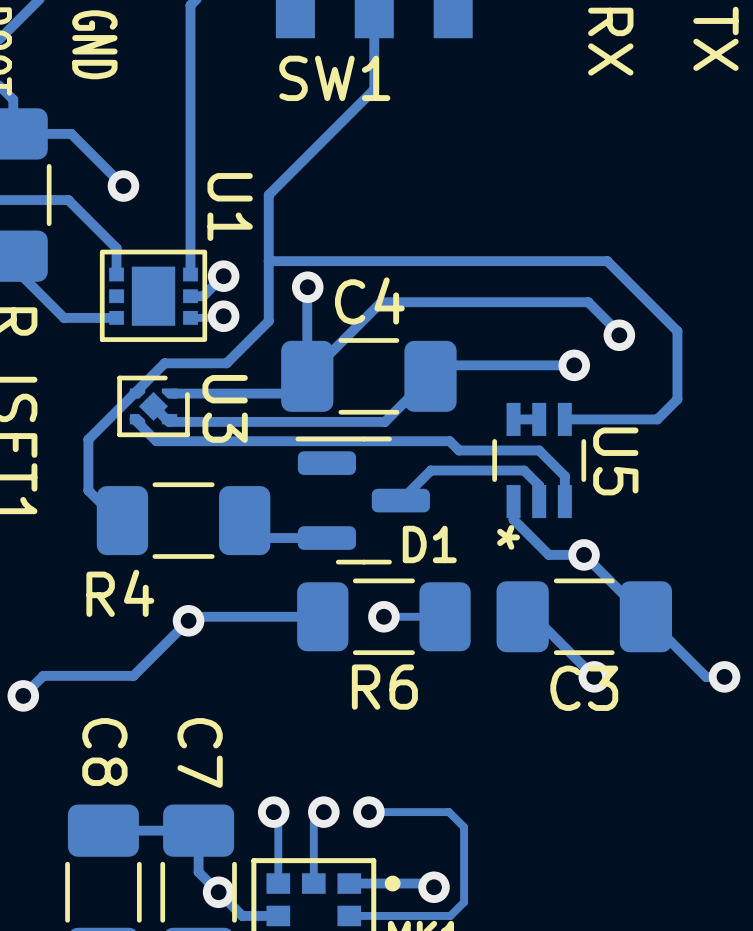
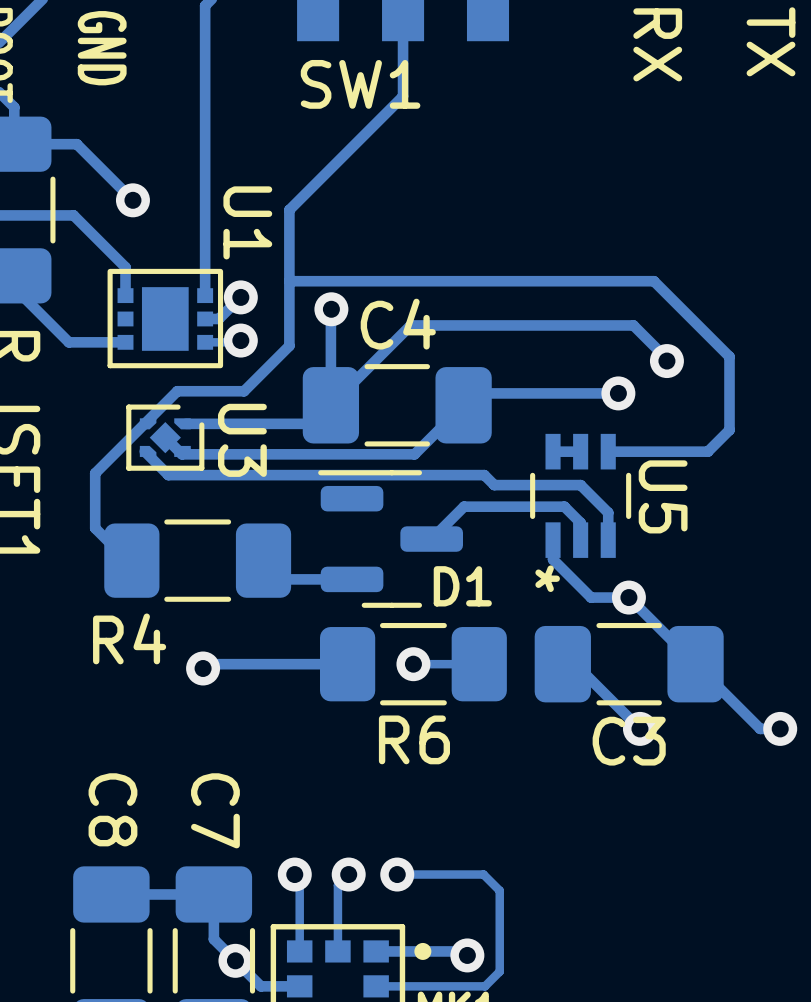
track: (188, 620) (133, 675) (43, 675) (23, 695) -> none
via: (23, 695) -> none

